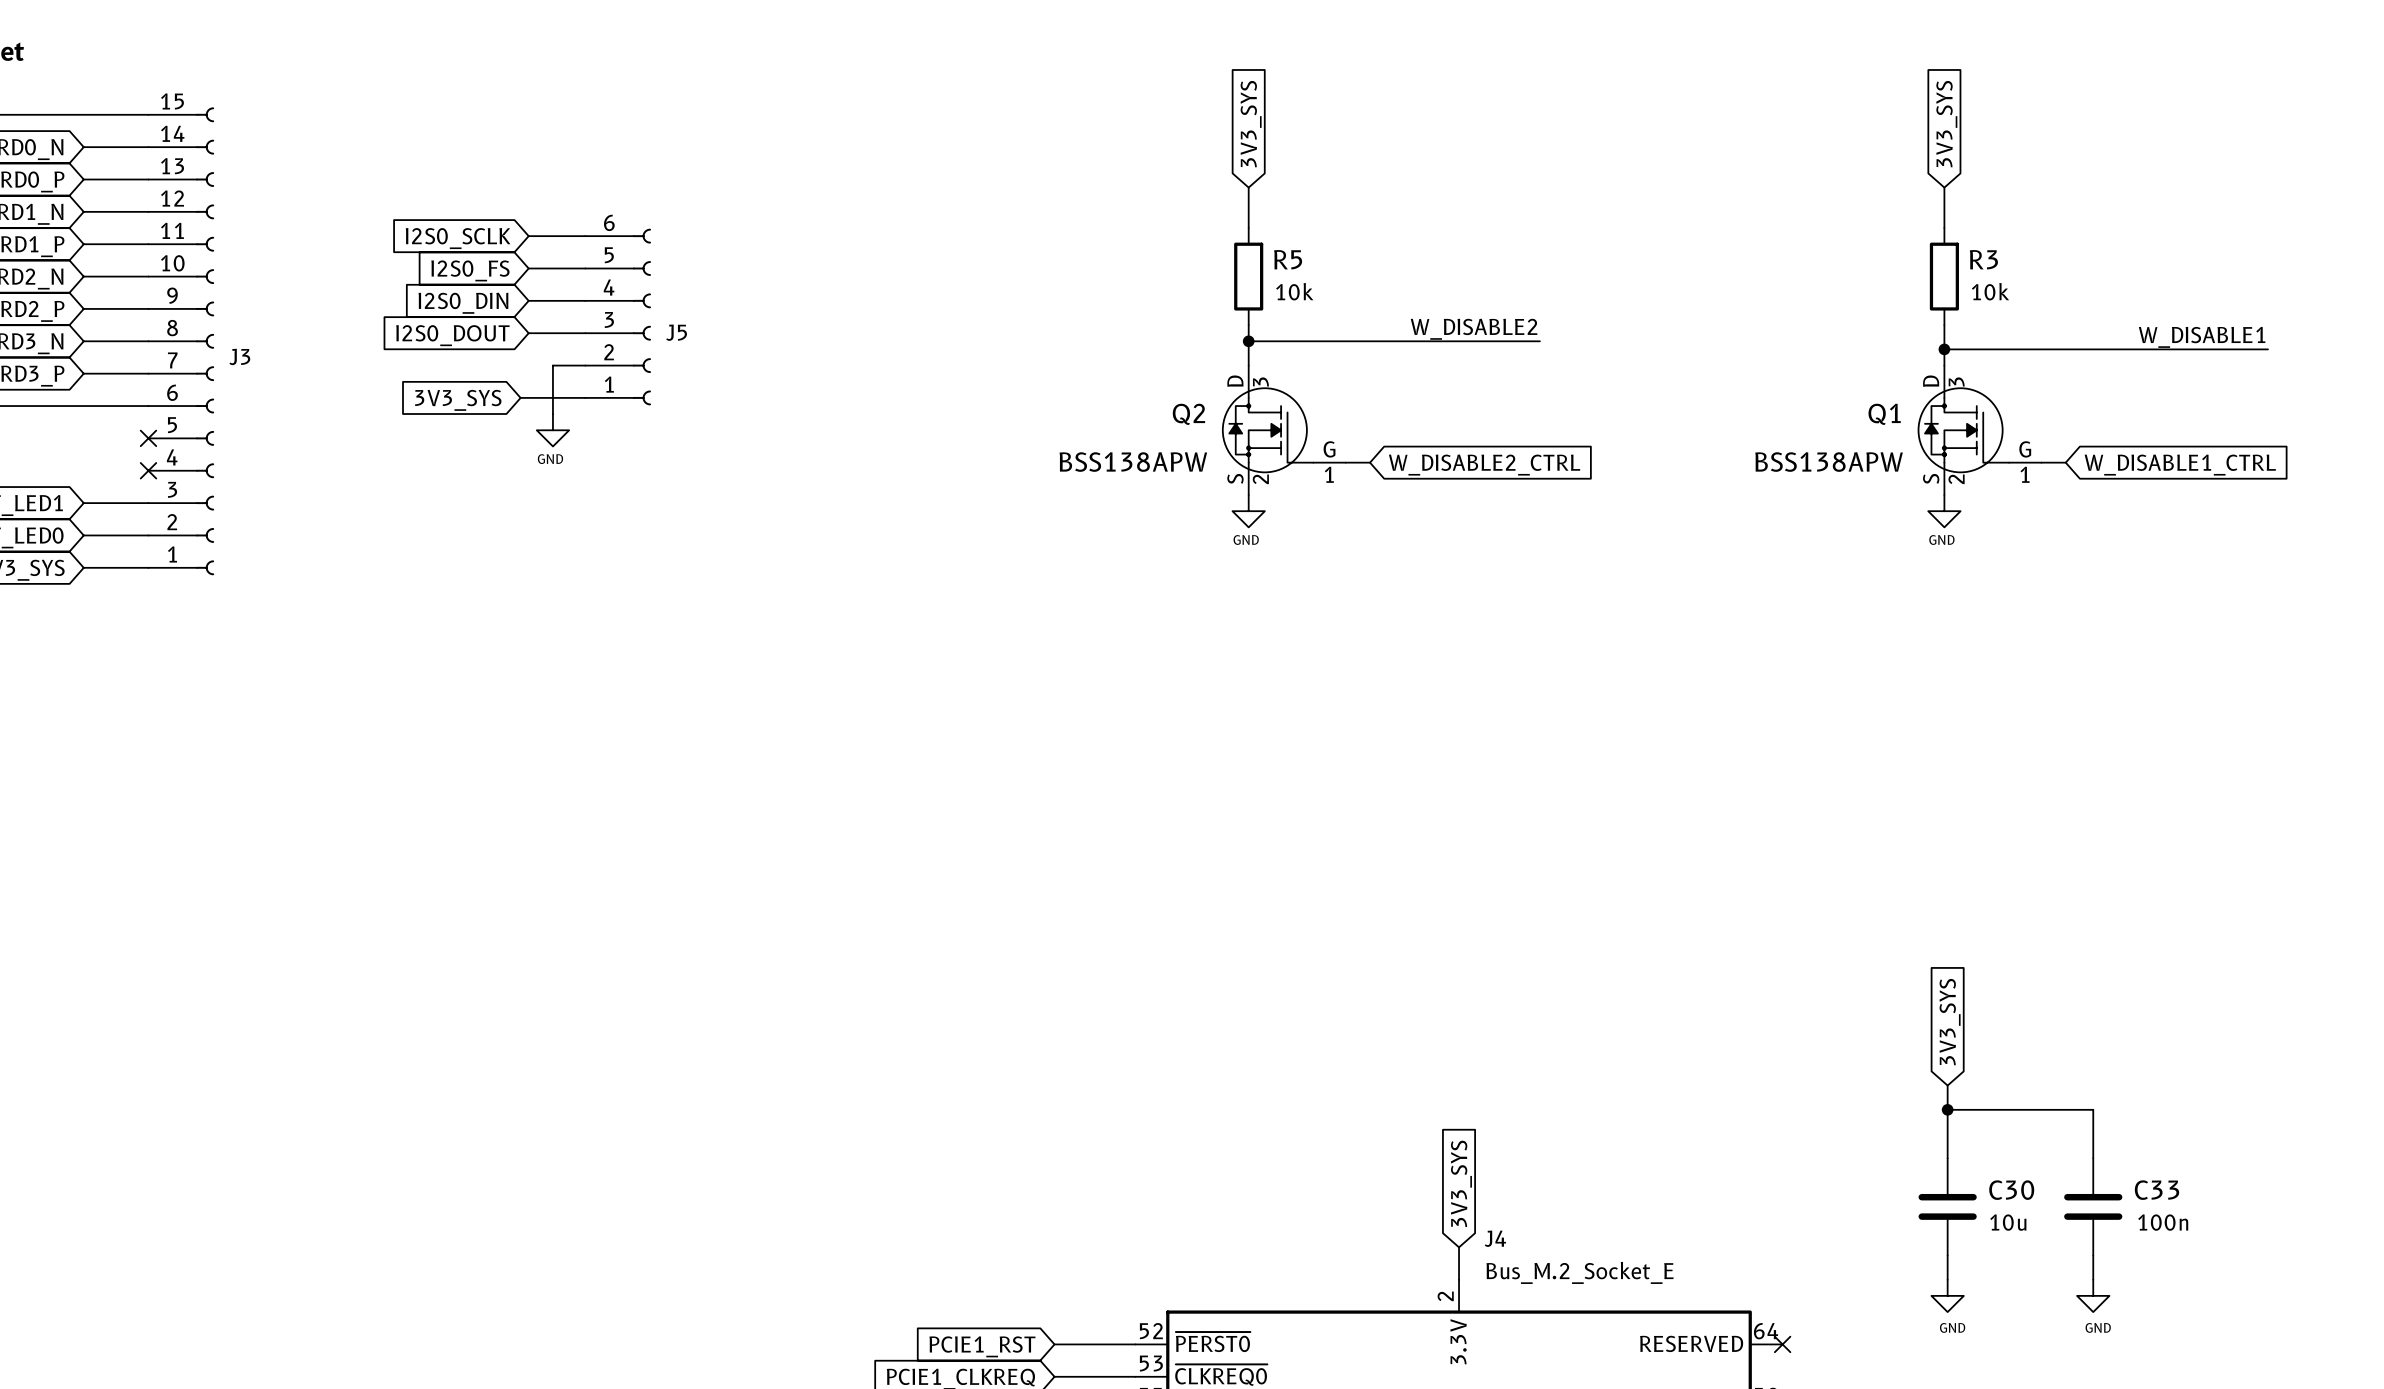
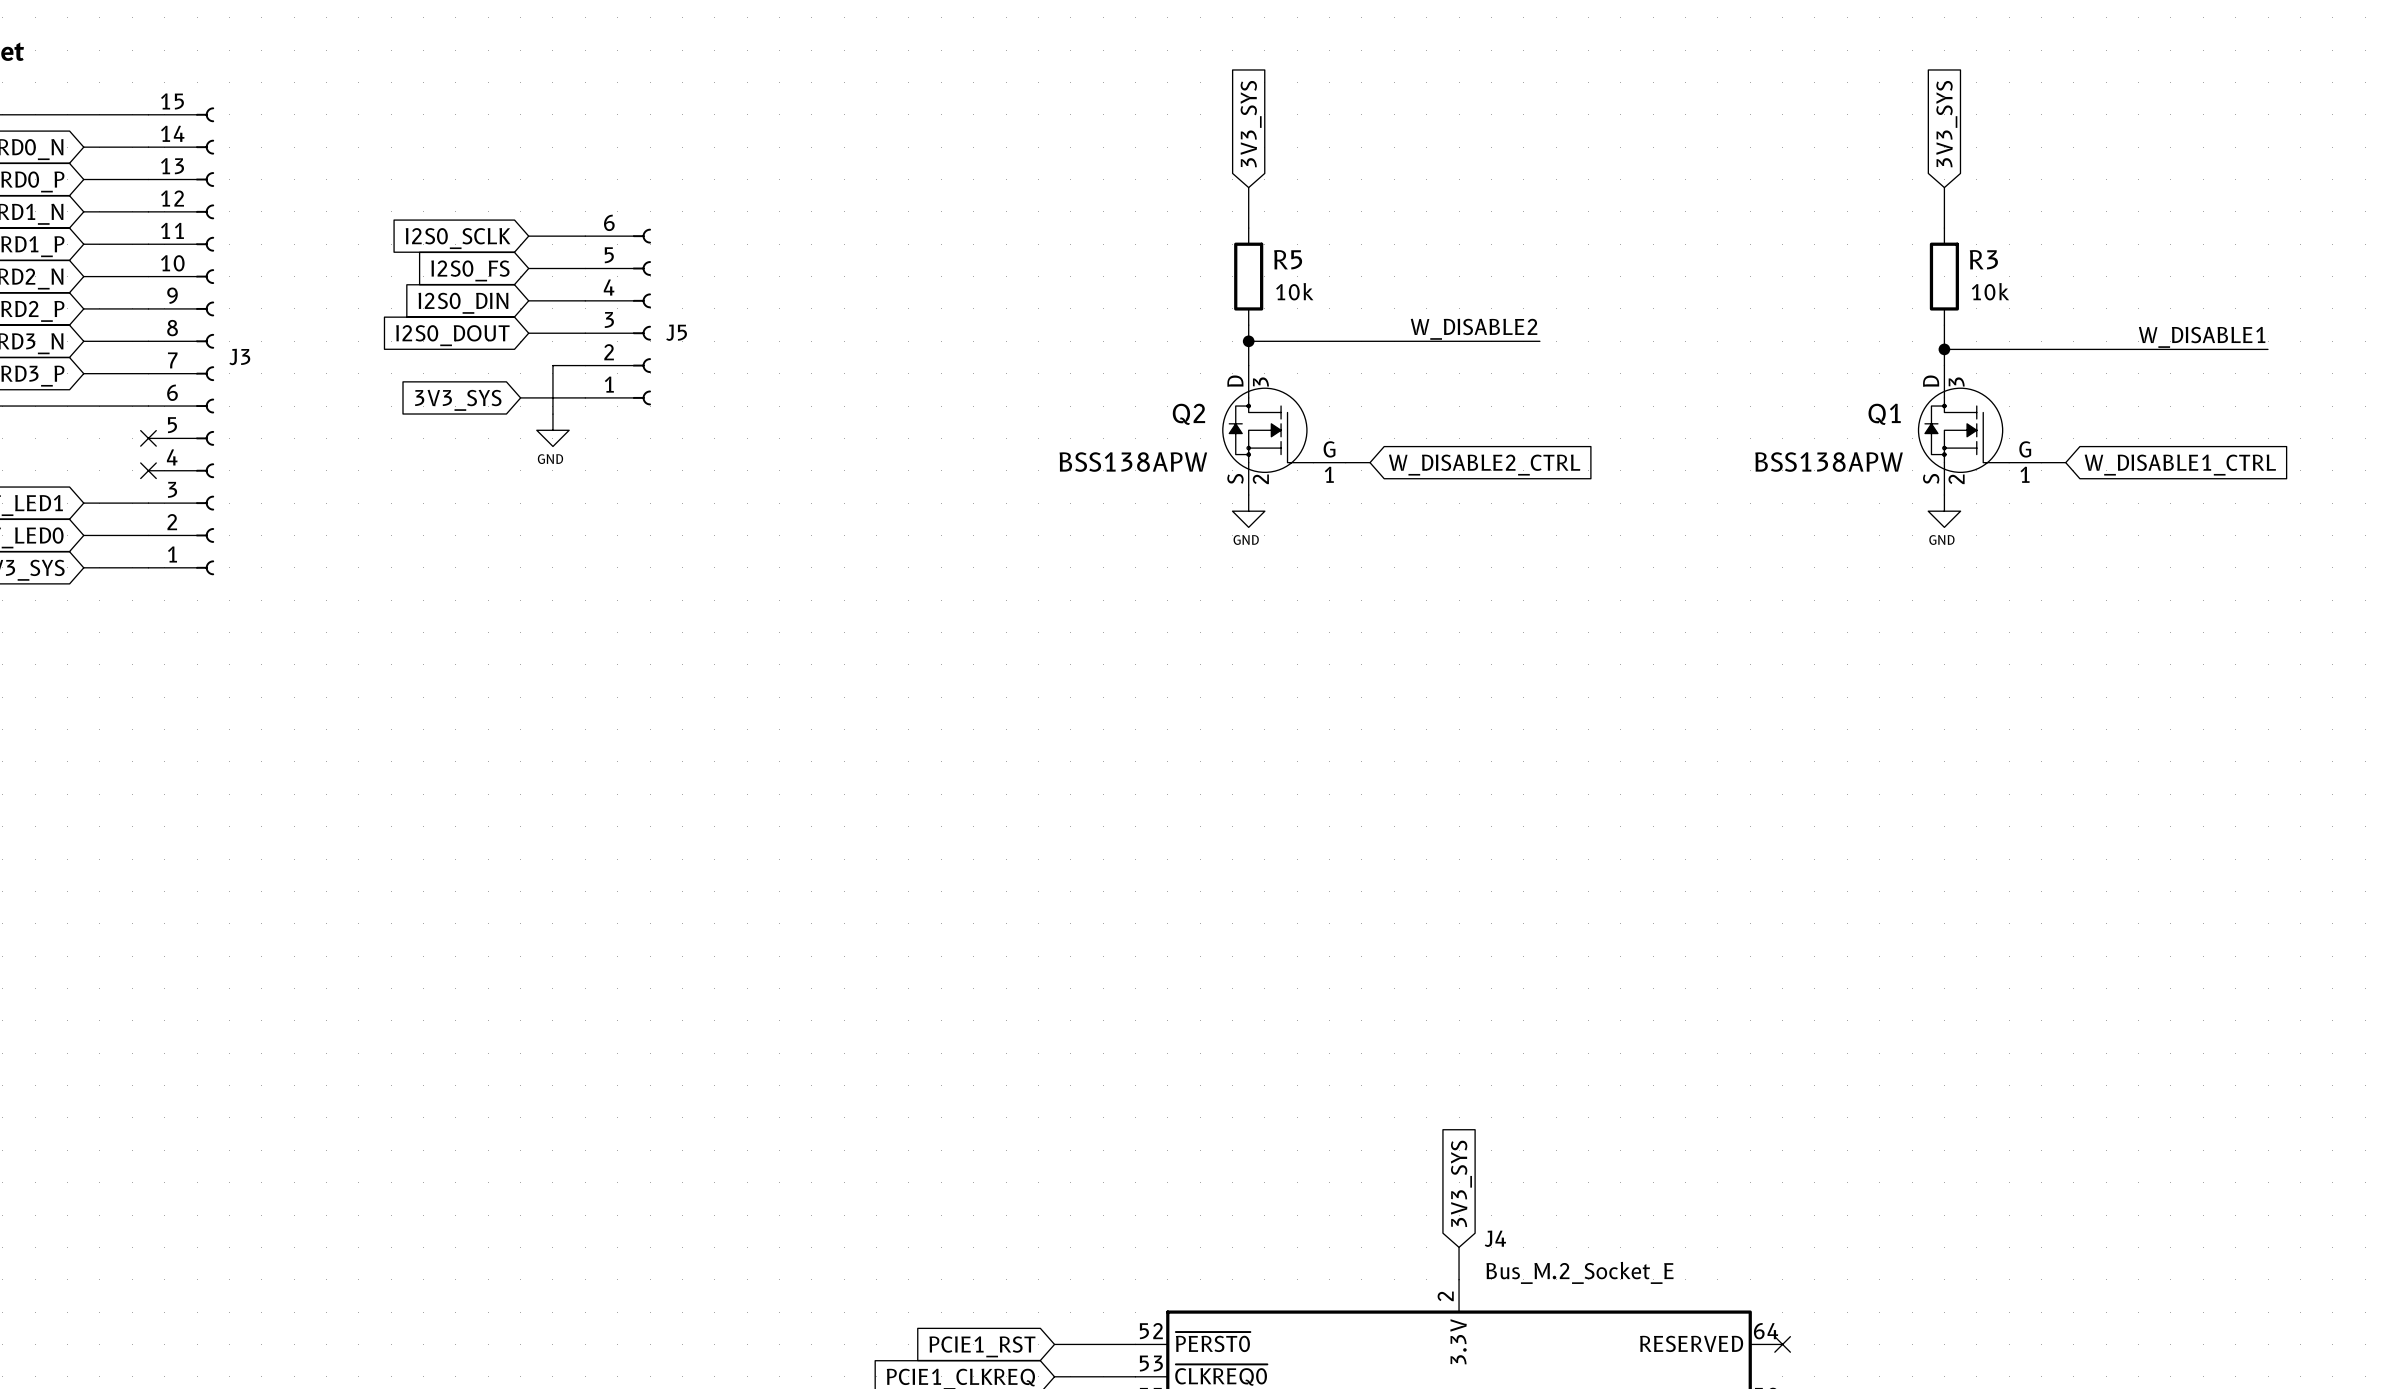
global label: 3V3_SYS (1950, 1022) -> none
wire: (1947, 1085) (1947, 1158) -> none
wire: (1947, 1109) (2093, 1109) (2093, 1158) -> none
junction: (1947, 1109) -> none
C30: (1947, 1206) -> none
C33: (2093, 1206) -> none
wire: (1947, 1255) (1947, 1279) -> none
wire: (2093, 1255) (2093, 1279) -> none
power symbol: GND (1947, 1295) -> none
power symbol: GND (2093, 1295) -> none

